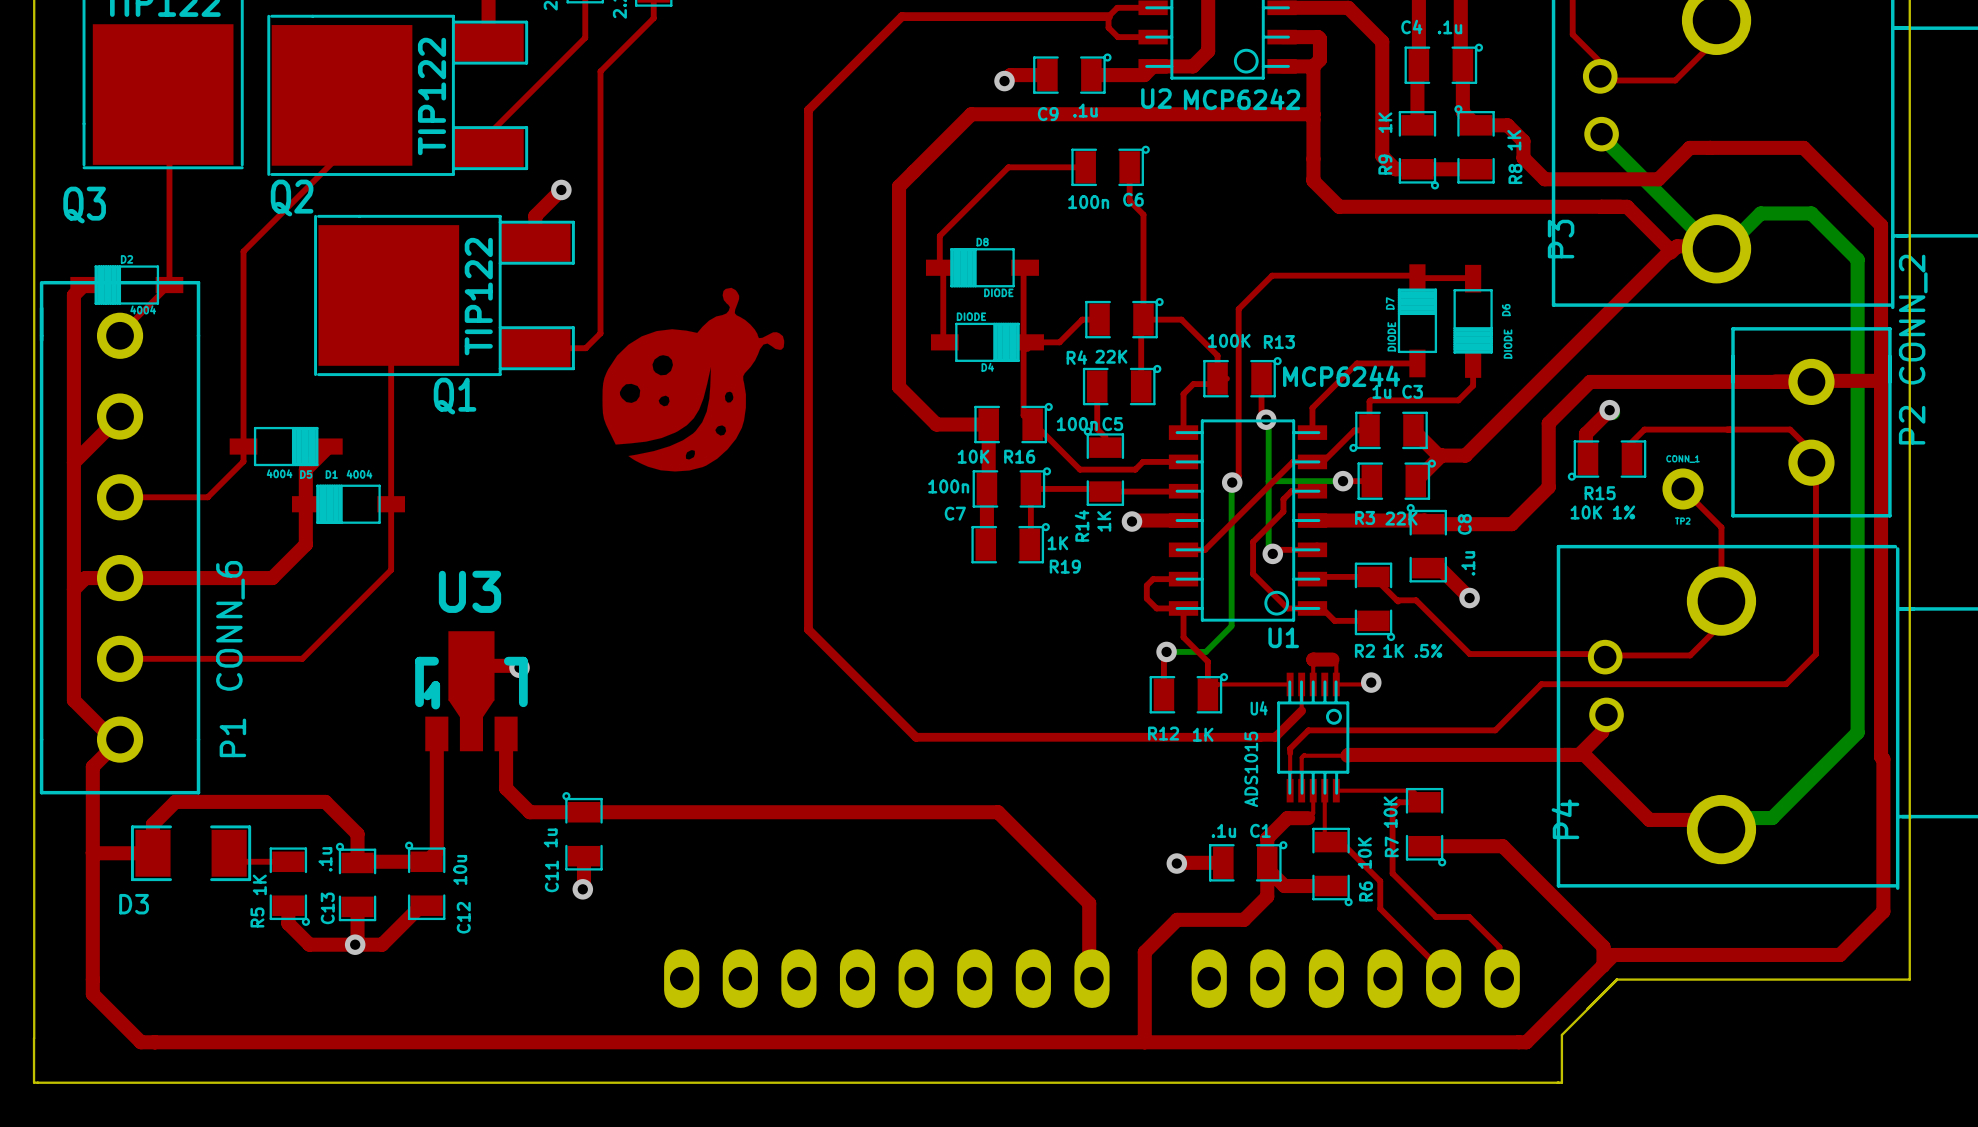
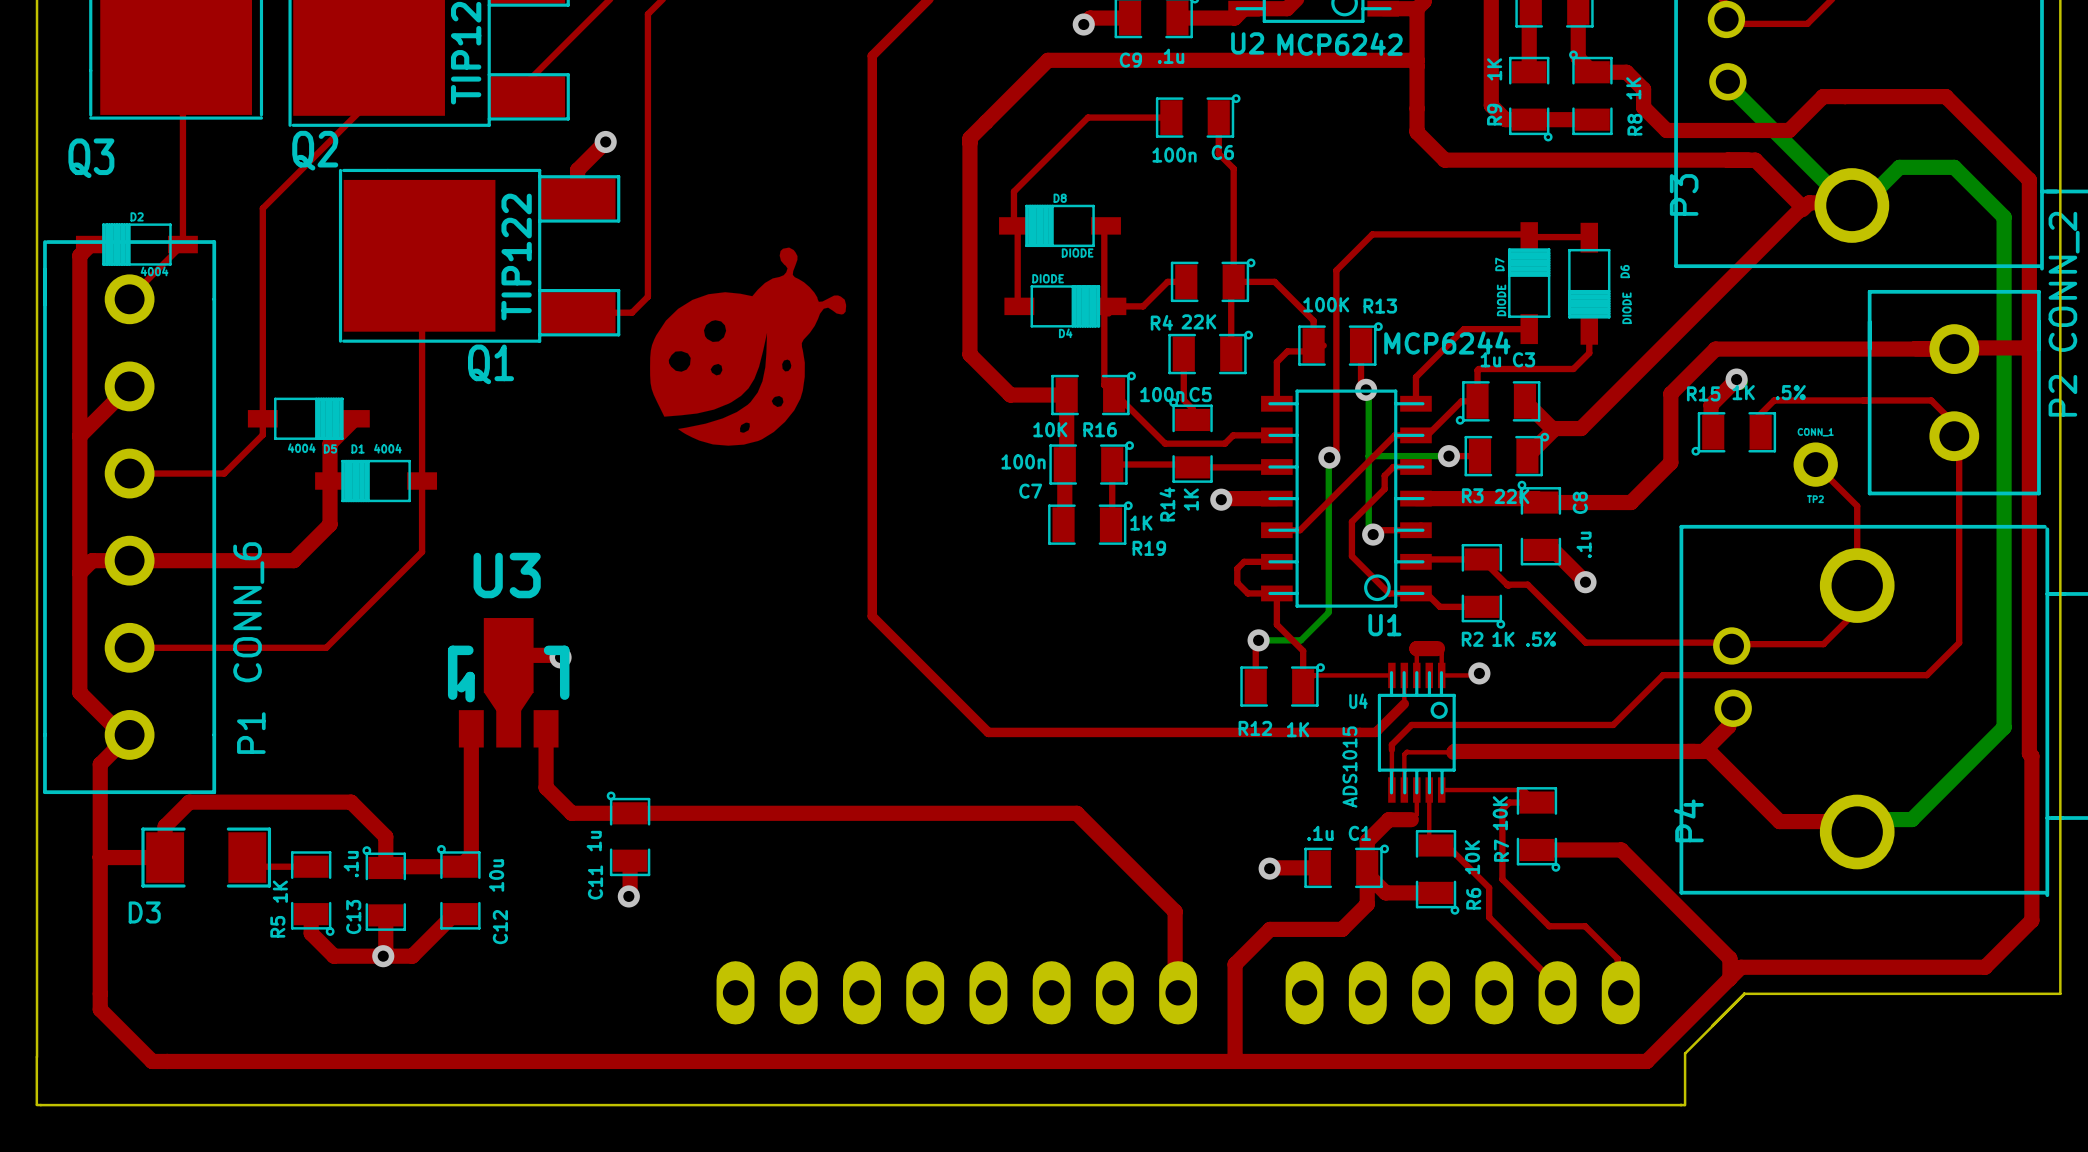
R15 name position: R15 (1600, 493) -> R15 (1703, 393)
R15 value: 10K 1% (1602, 512) -> 1K .5% (1769, 392)

